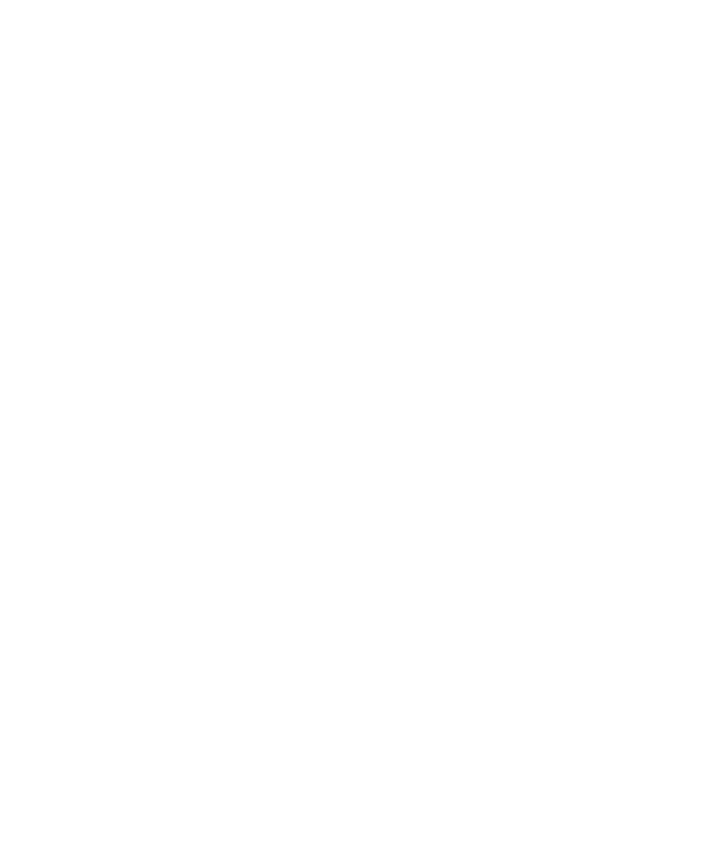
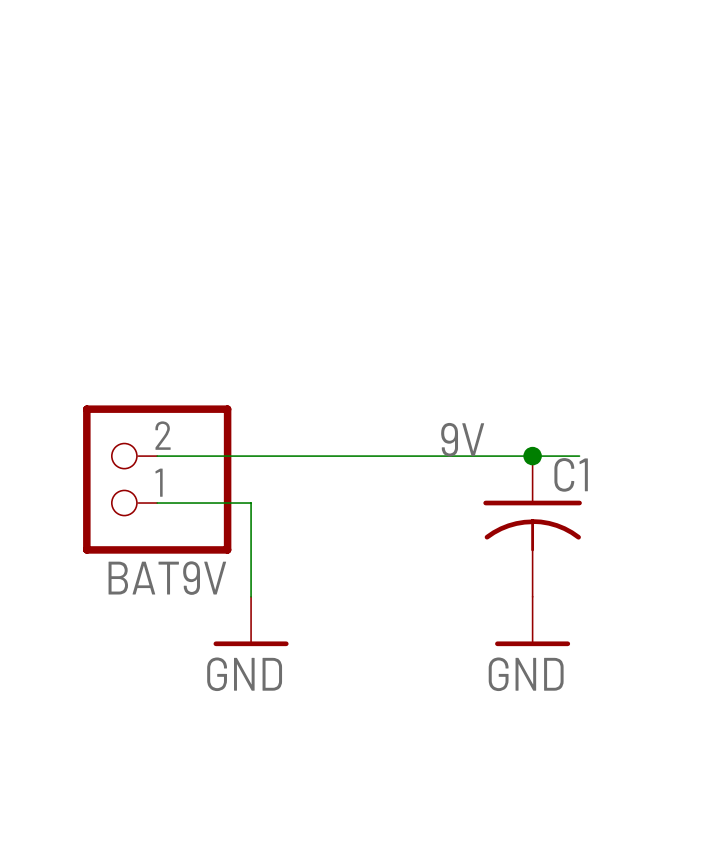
label: none -> 9V (462, 439)
wire: none -> (157, 456) (579, 456)
junction: none -> (532, 456)
BAT9V: none -> (157, 479)
wire: none -> (157, 503) (251, 503) (251, 596)
C1: none -> (532, 526)
power symbol: none -> GND (251, 621)
power symbol: none -> GND (532, 621)

